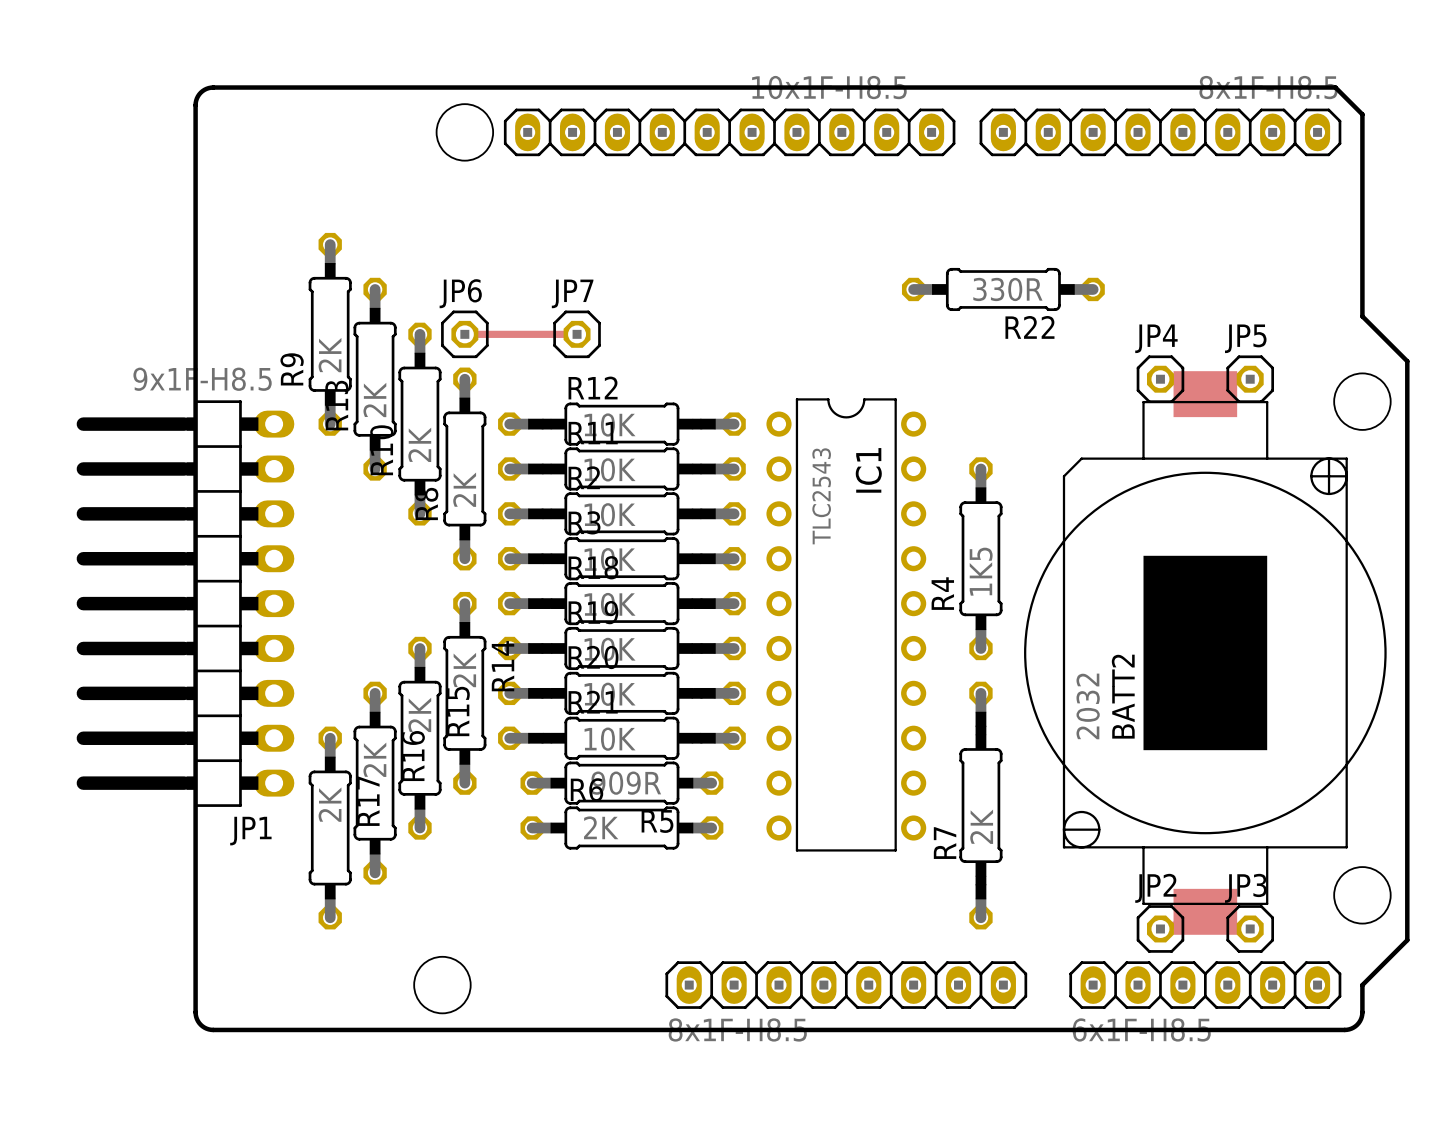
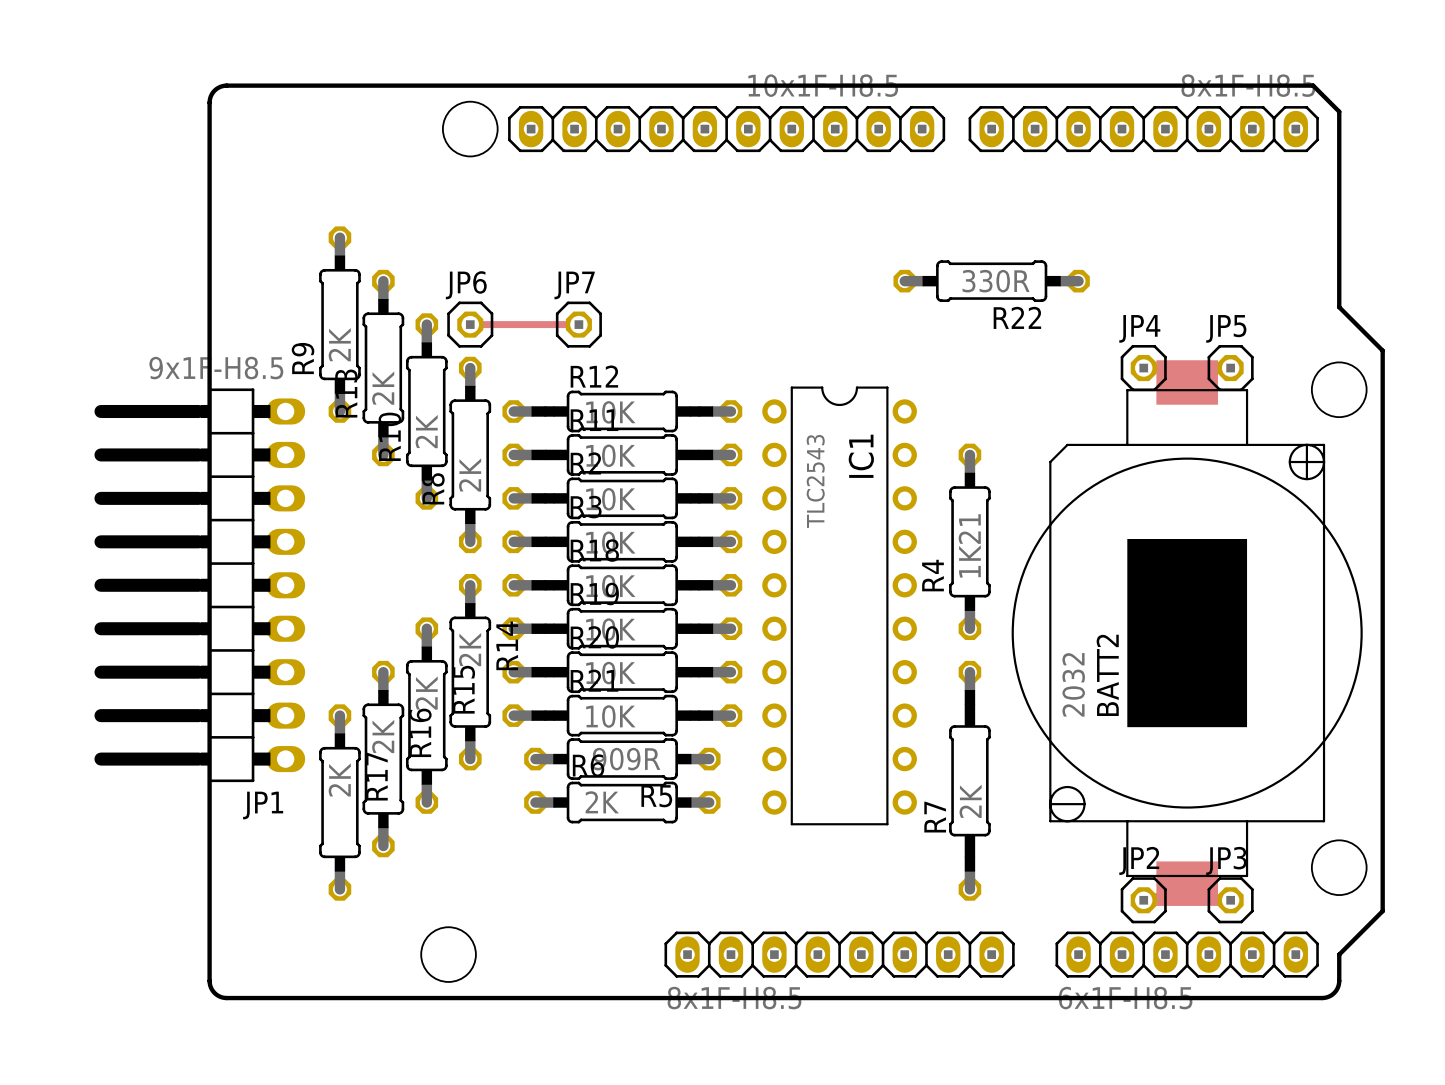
R4 value: 1K5 (981, 571) -> 1K21 (969, 545)

